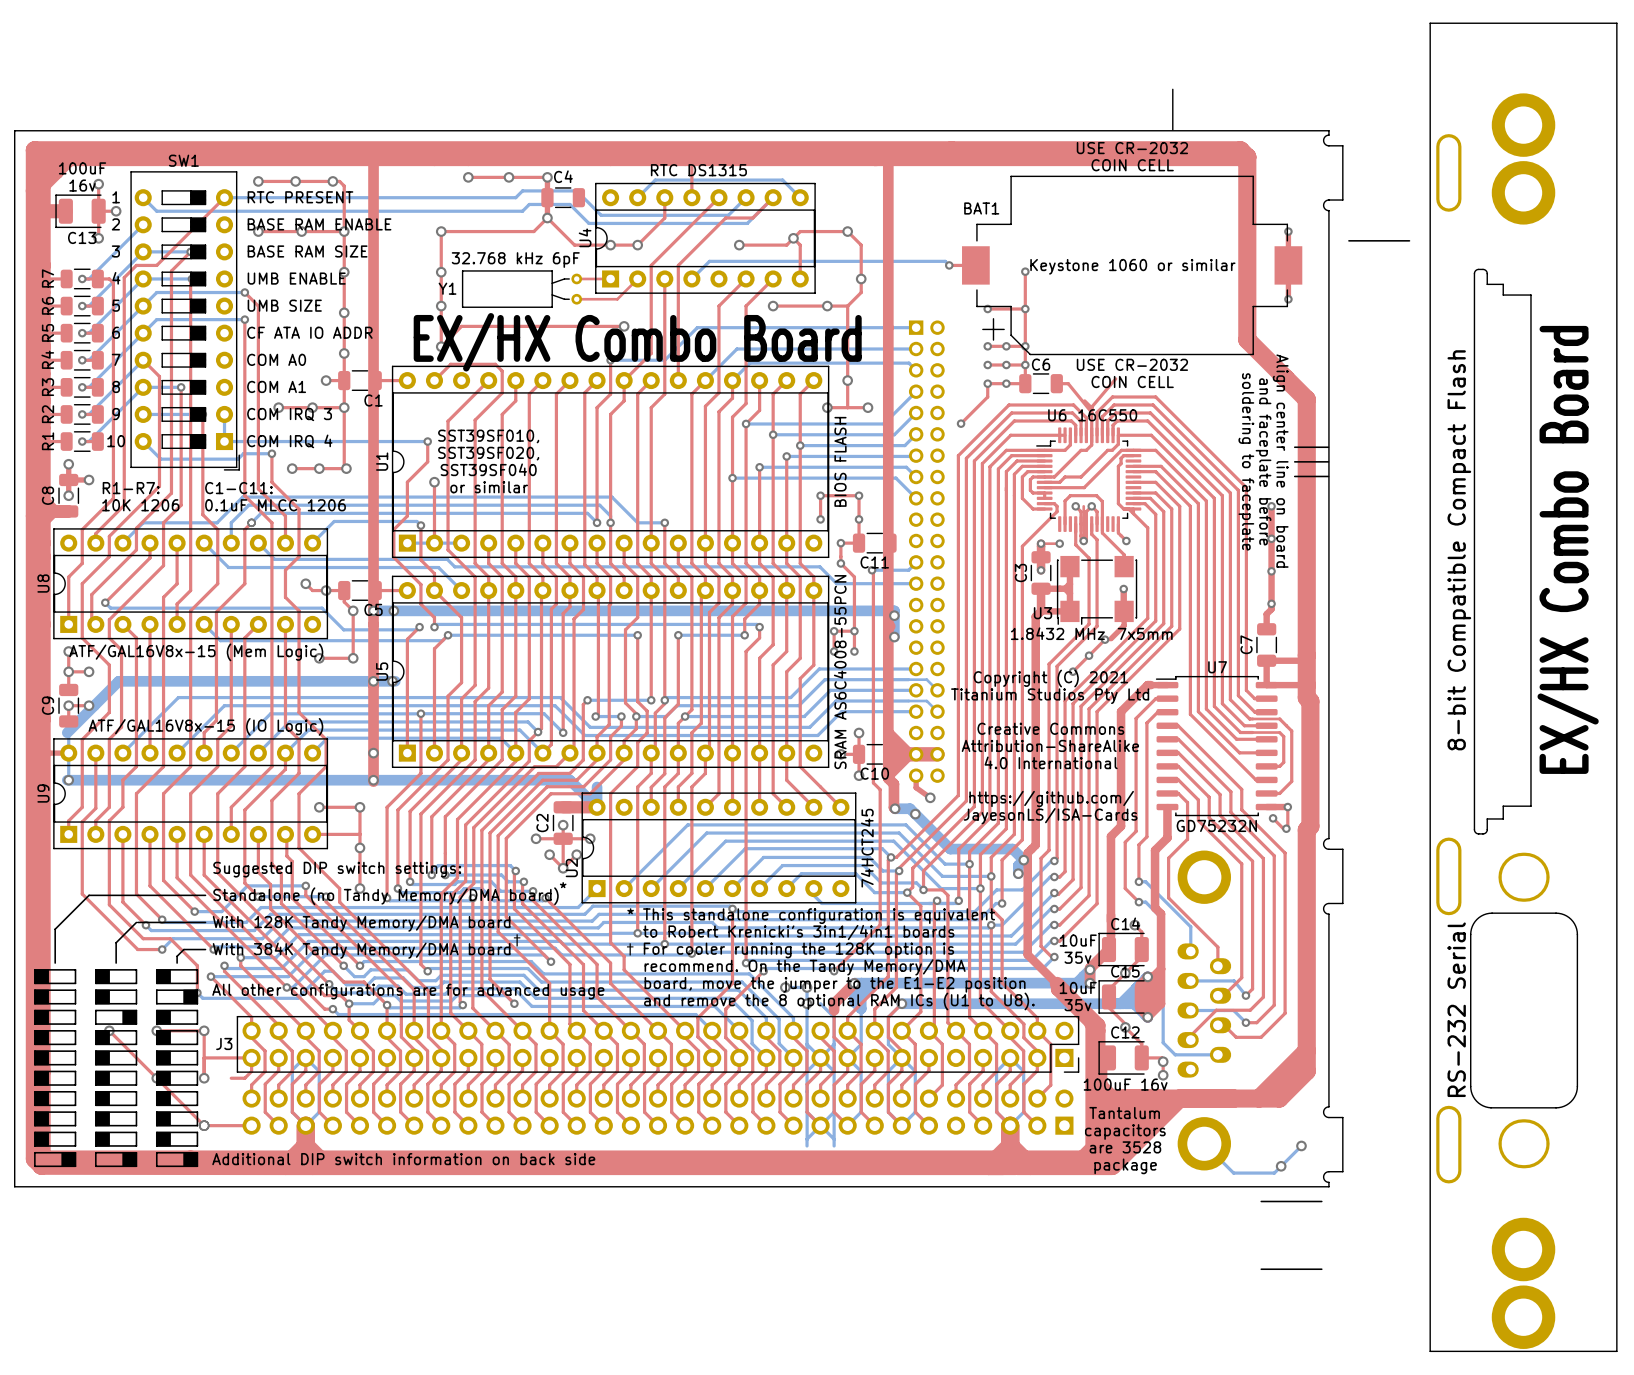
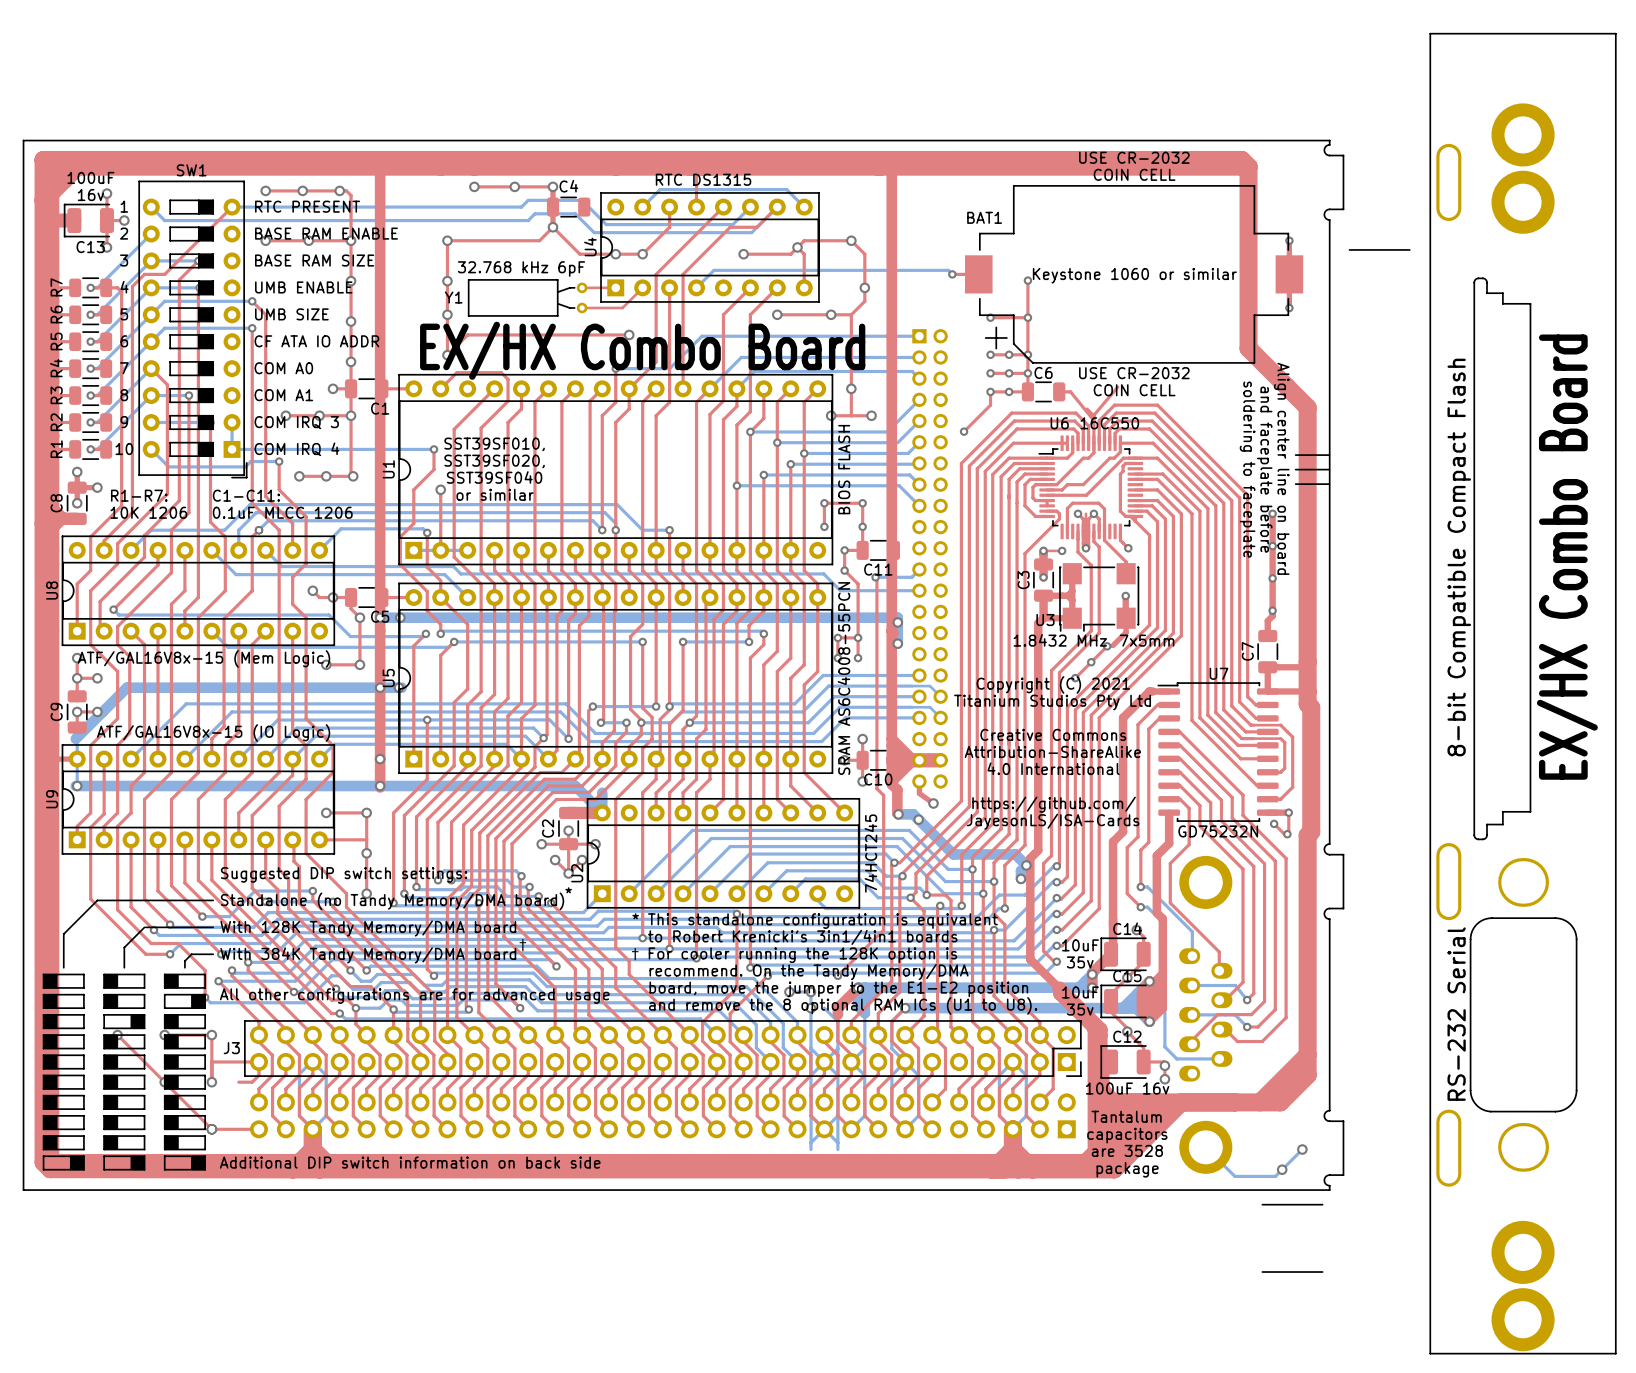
line: (1172, 89) (1172, 129) -> none

